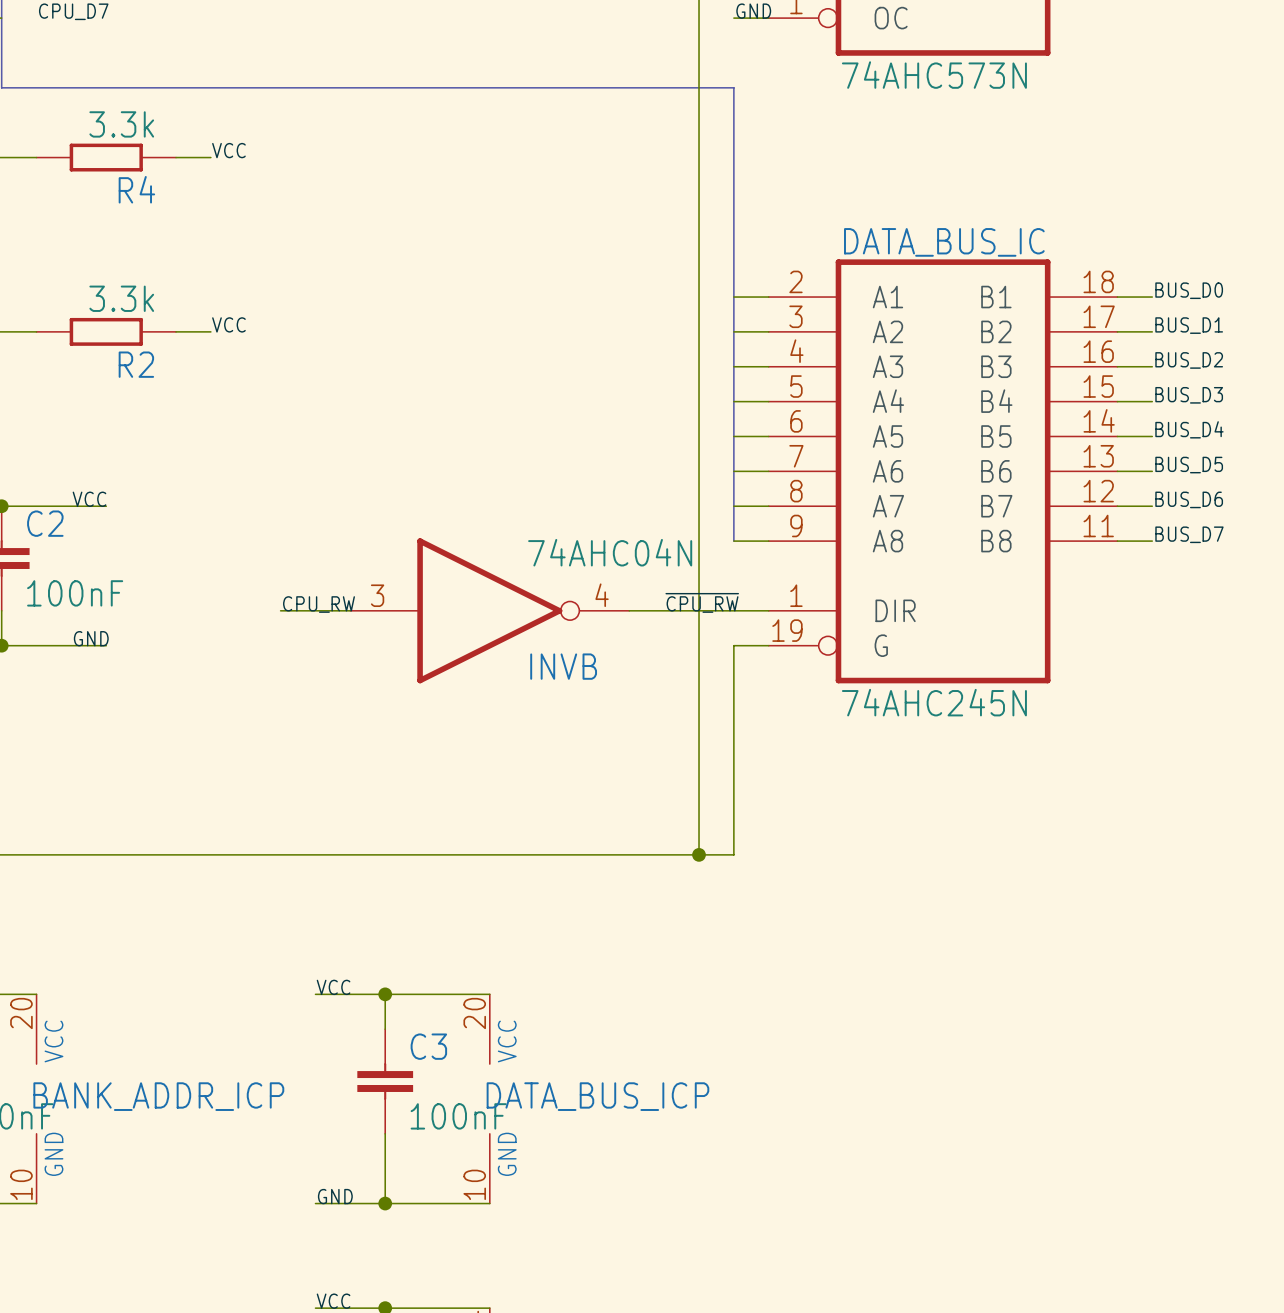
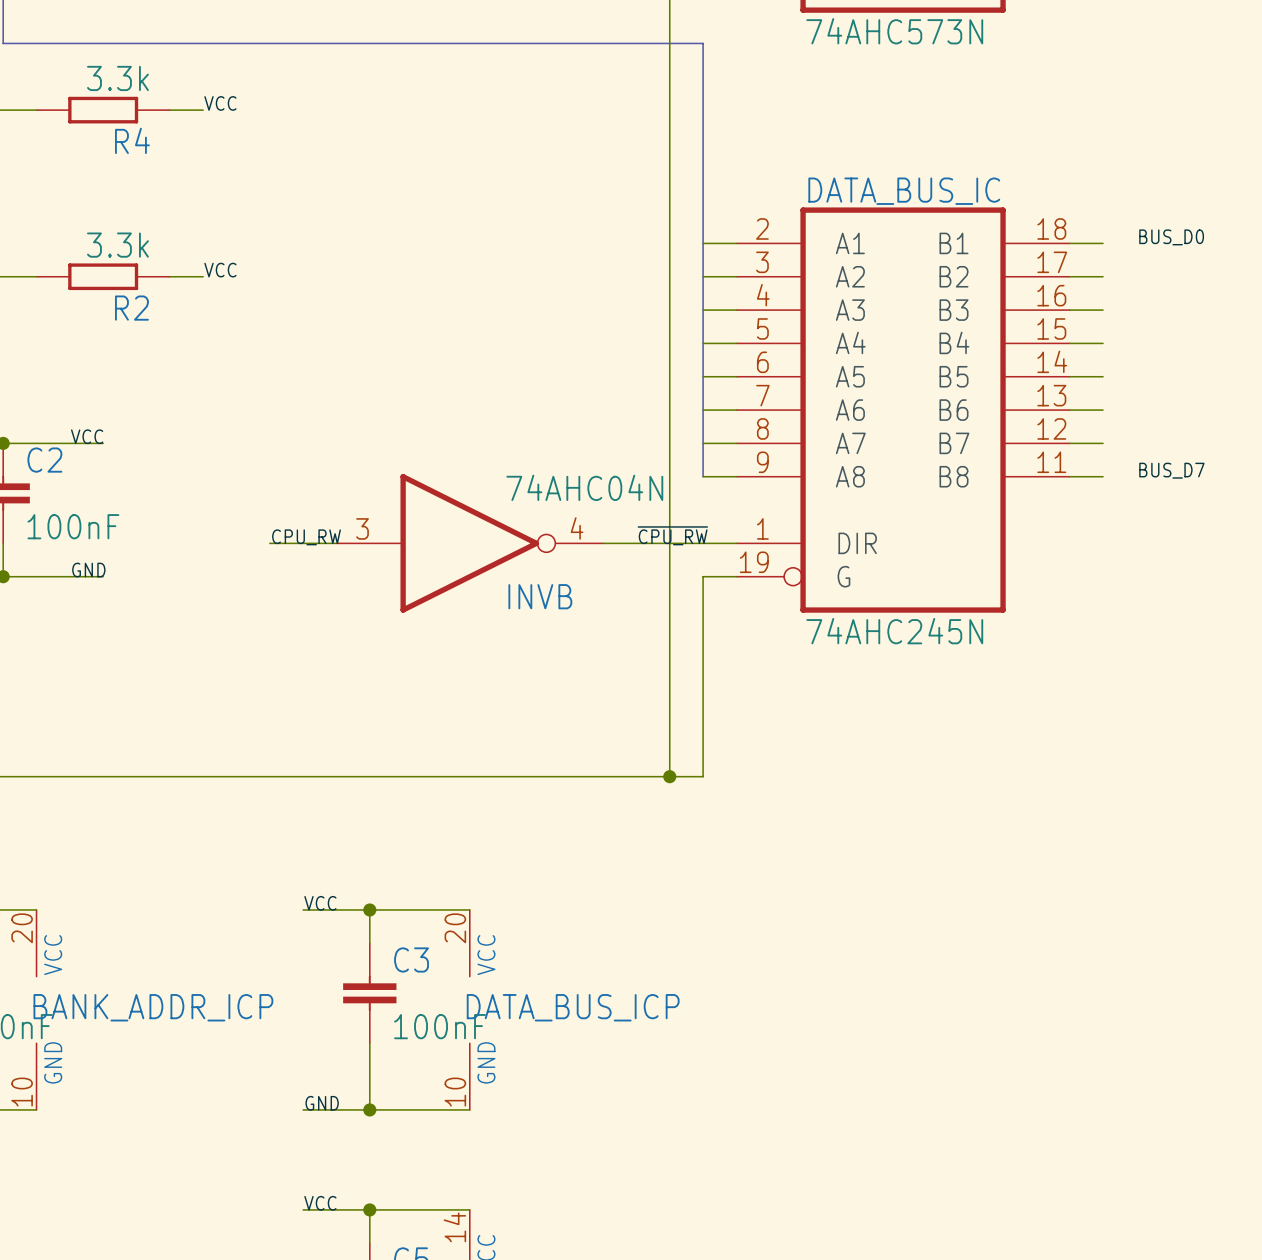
label position: BUS_D0 (1189, 290) -> BUS_D0 (1171, 237)
label: BUS_D1 (1189, 325) -> none
label: BUS_D2 (1189, 360) -> none
label: BUS_D3 (1189, 395) -> none
label: BUS_D4 (1189, 429) -> none
label: BUS_D5 (1189, 465) -> none
label: BUS_D6 (1189, 499) -> none
label position: BUS_D7 (1189, 534) -> BUS_D7 (1171, 470)

